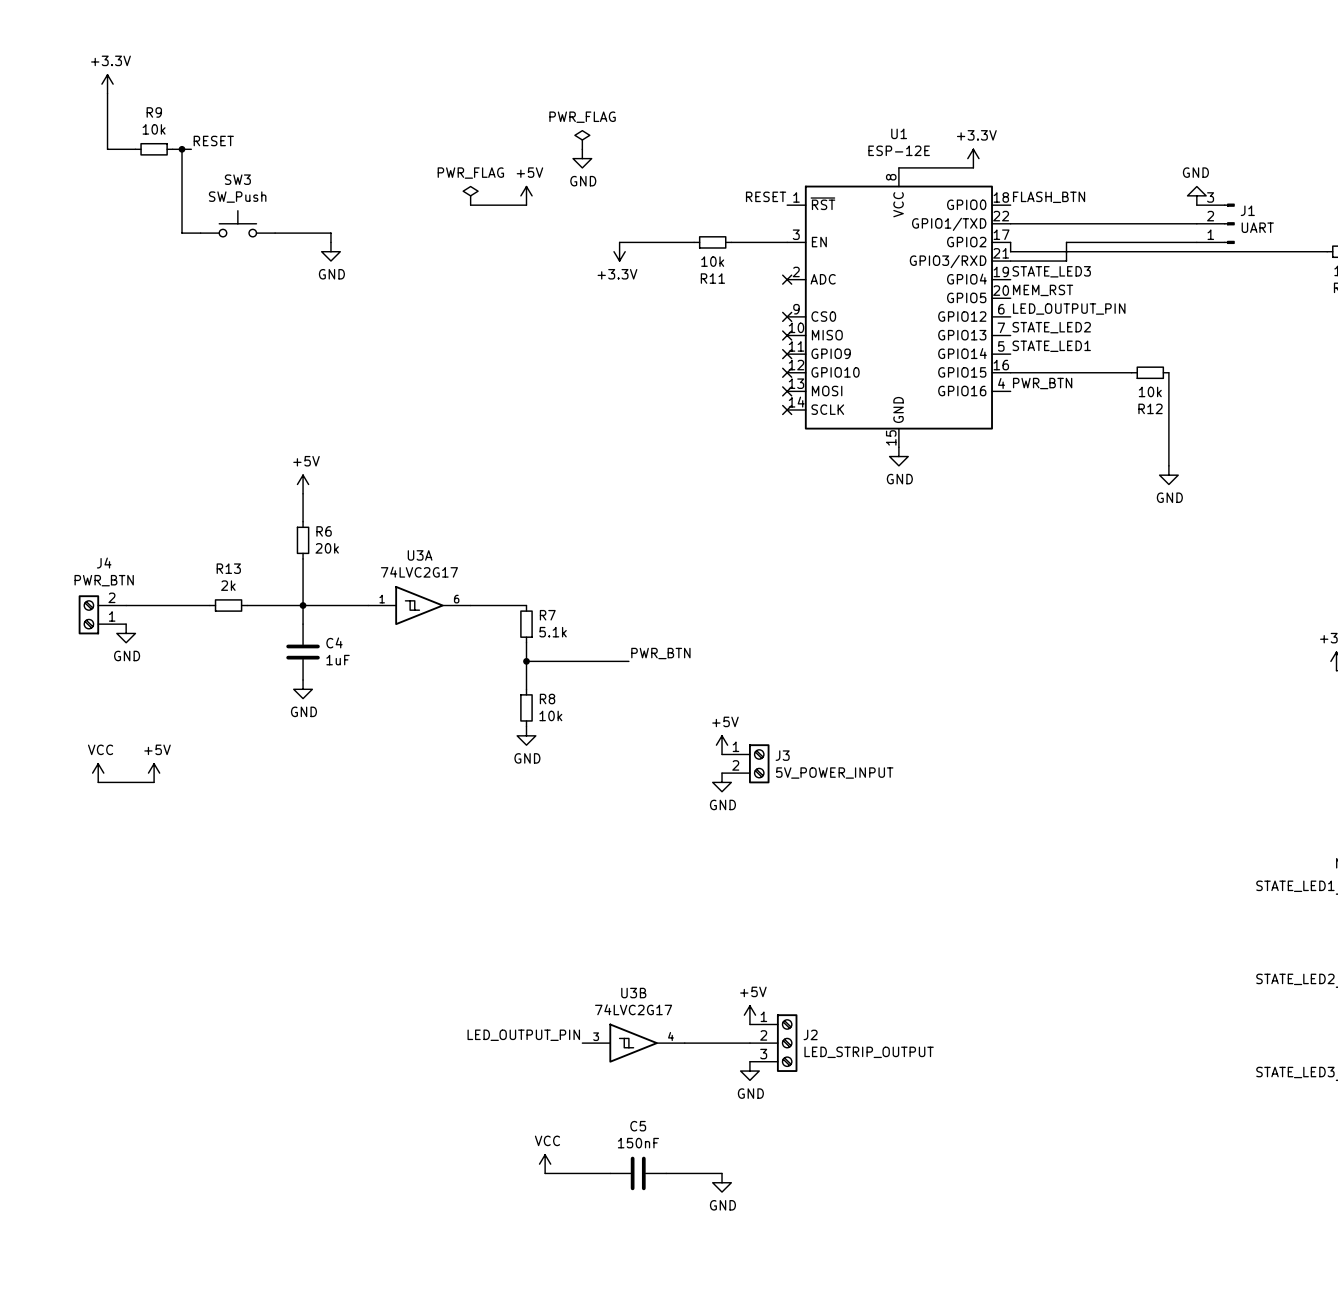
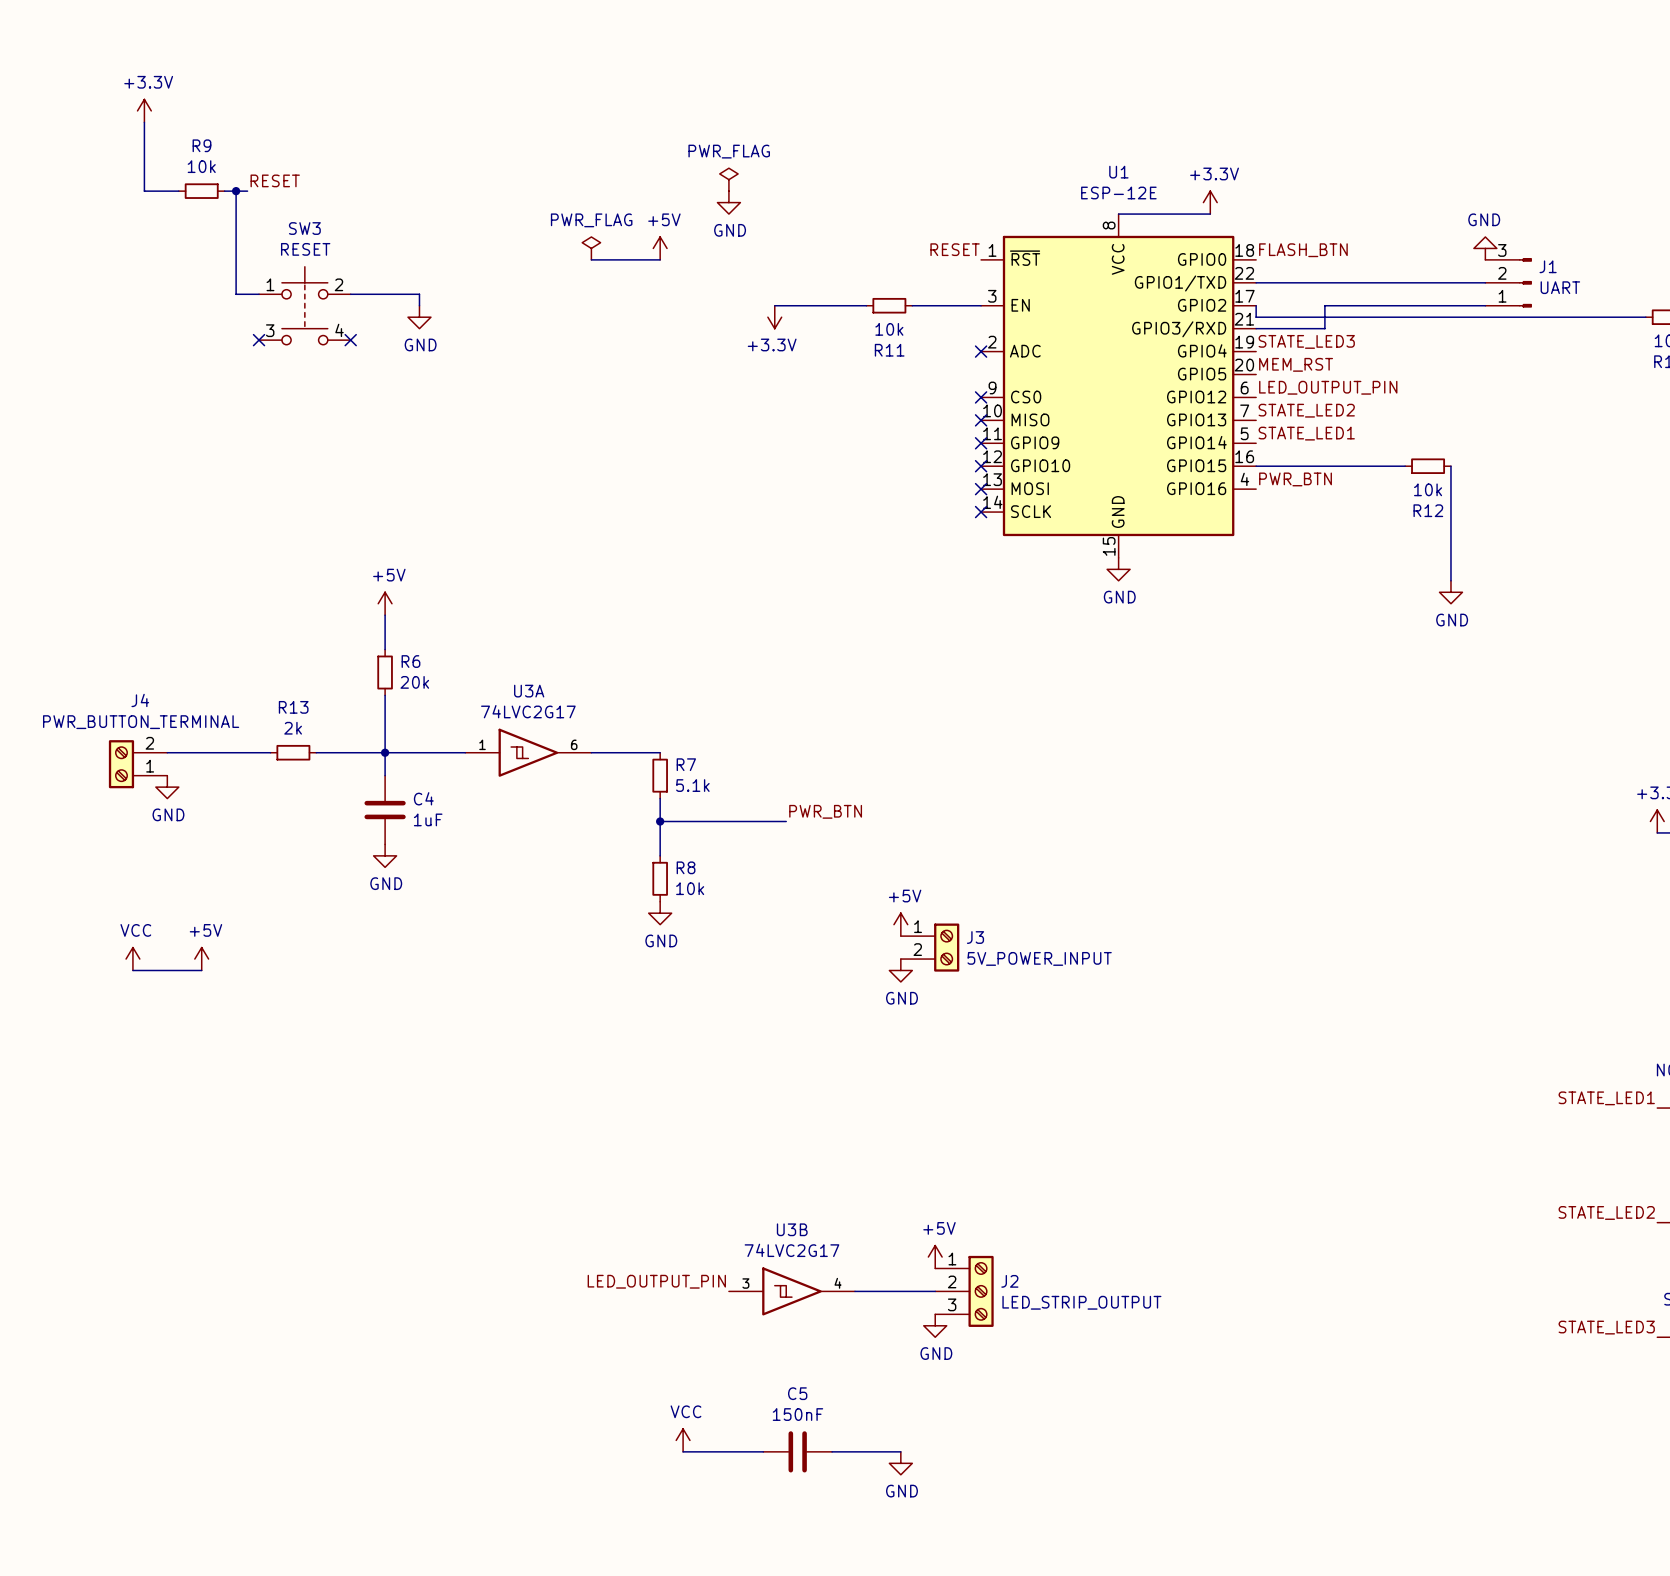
SW3 value: SW_Push (237, 197) -> RESET (305, 249)
SW3 symbol: [200, 210, 276, 237] -> [259, 266, 351, 345]
no-connect mark: none -> (259, 340)
no-connect mark: none -> (350, 340)
J4 value: PWR_BTN (104, 580) -> PWR_BUTTON_TERMINAL (141, 722)

